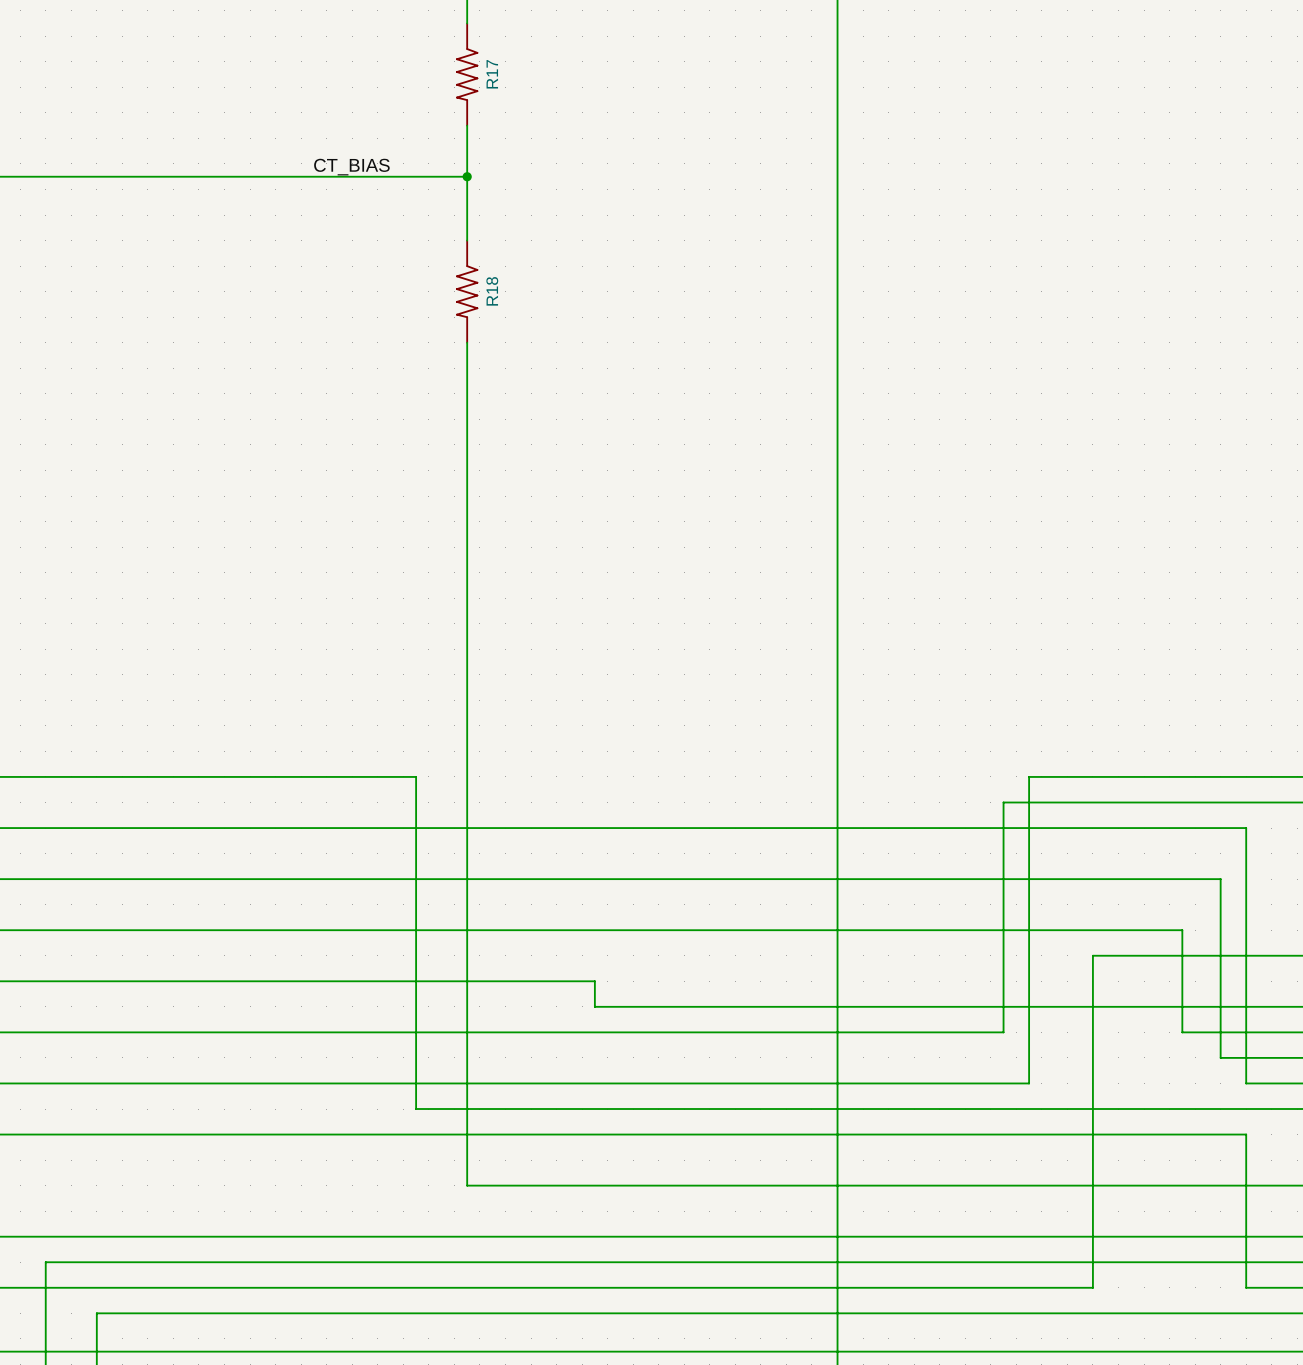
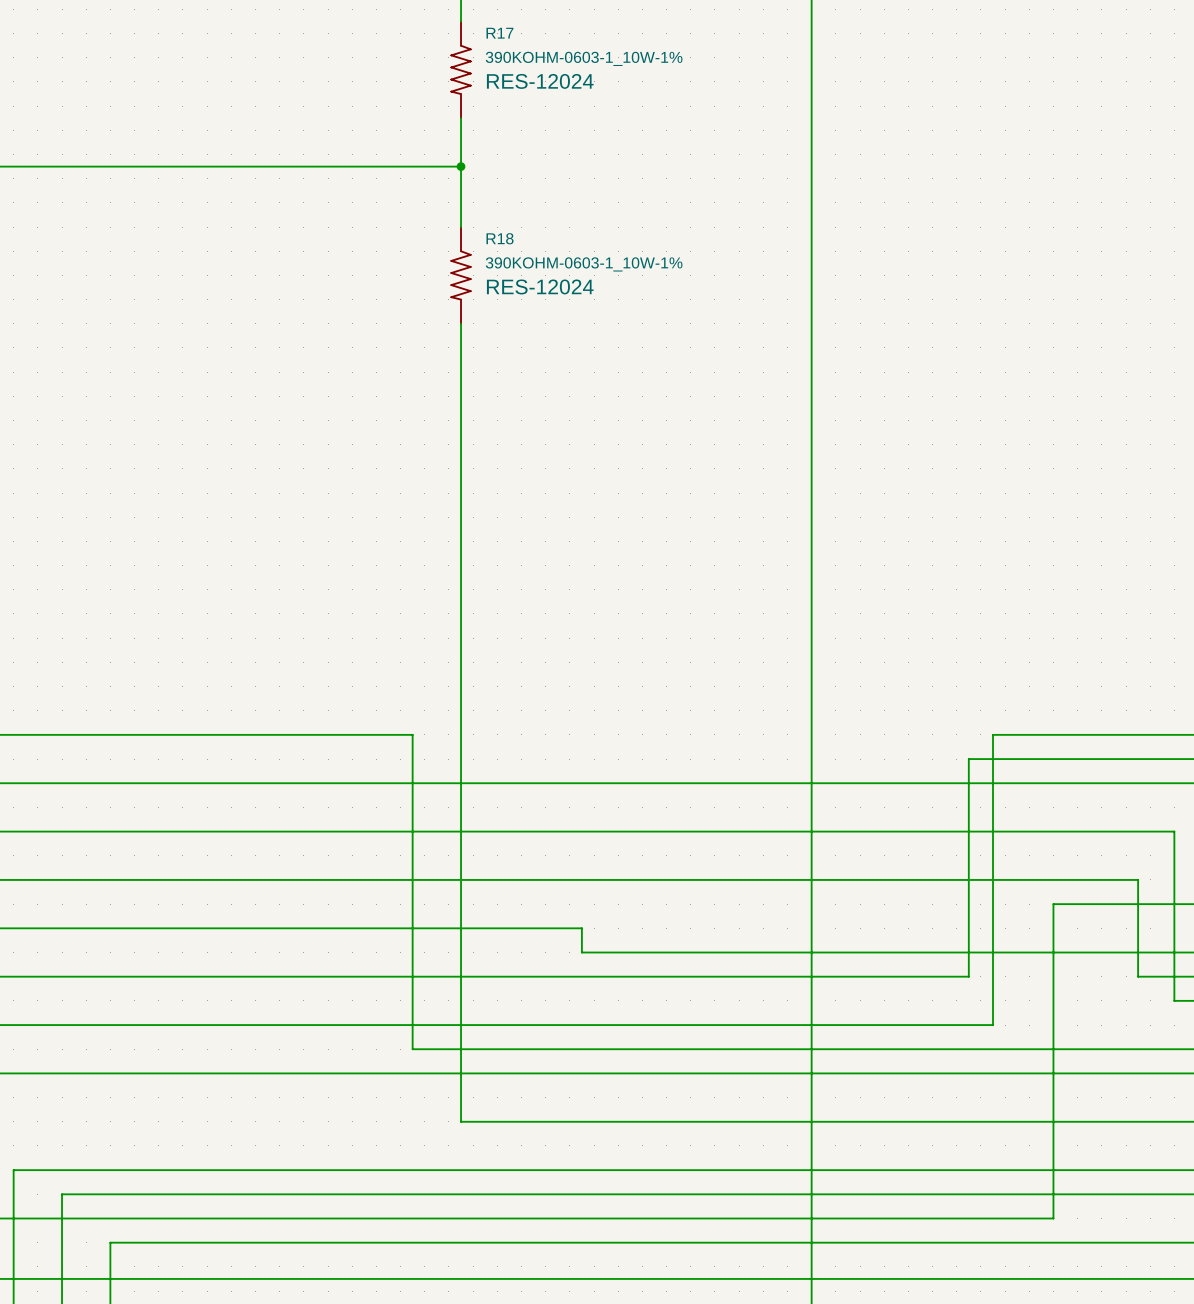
R17 value: none -> 390KOHM-0603-1_10W-1% (584, 58)
R17 name rotation: 0° (492, 74) -> 90° clockwise (499, 33)
R17 name position: R17 (492, 74) -> R17 (499, 33)
R17 text: none -> RES-12024 (540, 81)
label: CT_BIAS (351, 167) -> none
R18 value: none -> 390KOHM-0603-1_10W-1% (584, 264)
R18 name rotation: 0° (492, 291) -> 90° clockwise (500, 238)
R18 name position: R18 (492, 291) -> R18 (500, 238)
R18 text: none -> RES-12024 (540, 286)

